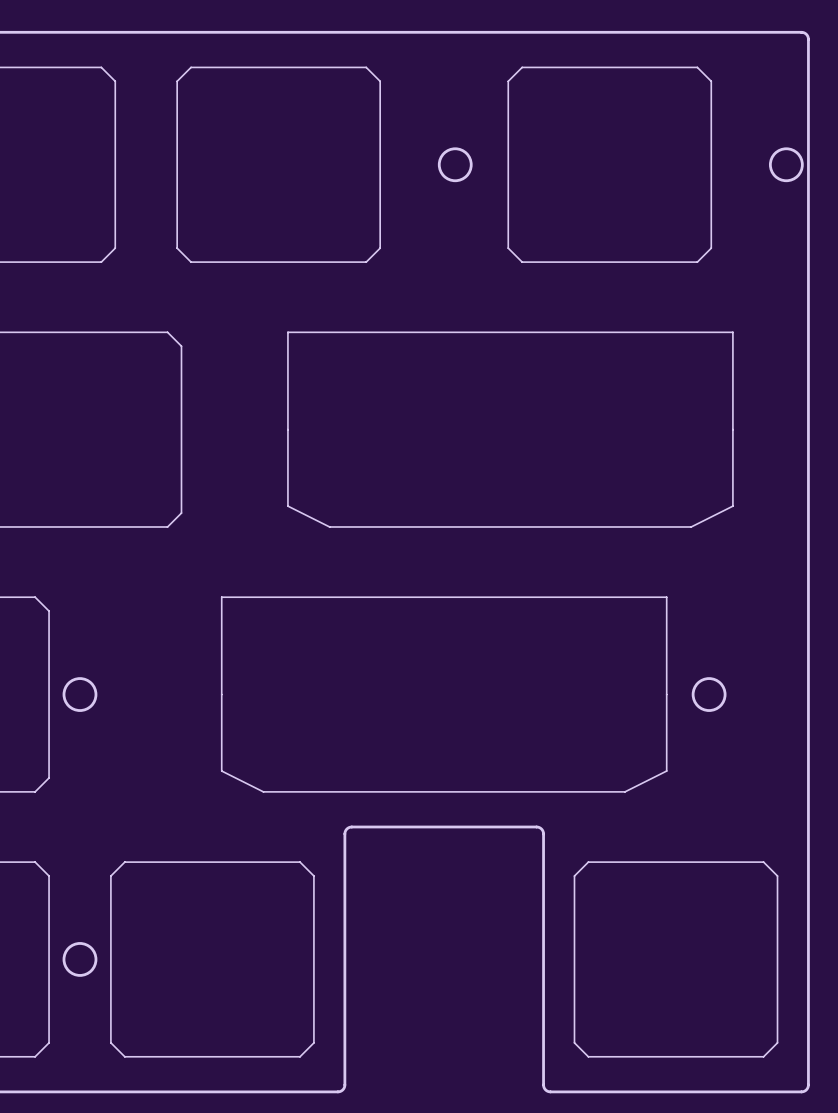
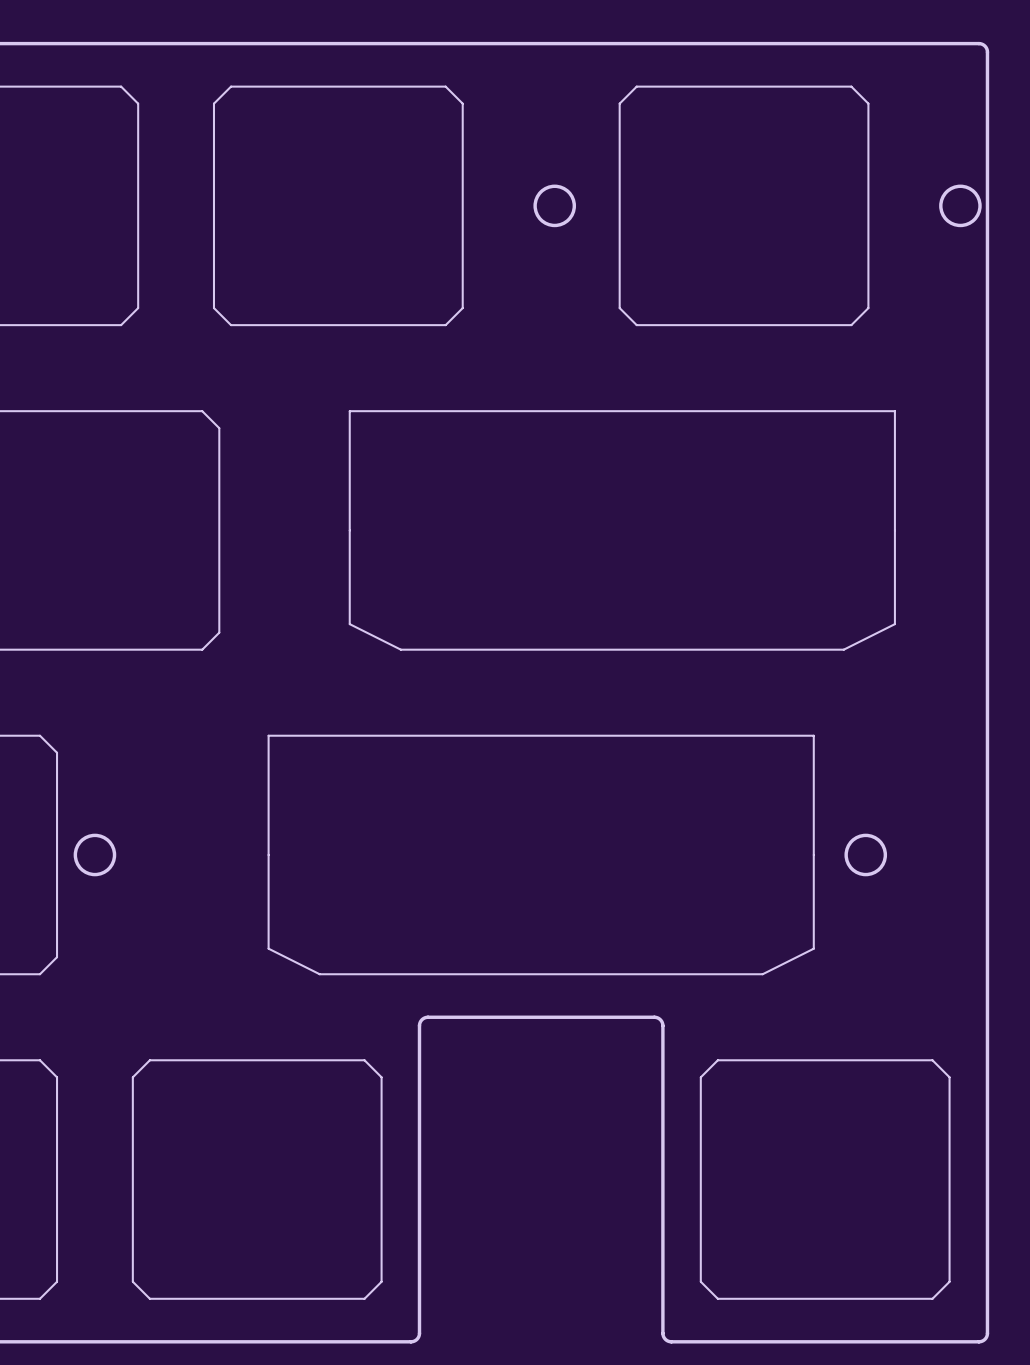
round board edge: [62, 942, 98, 977] -> none

